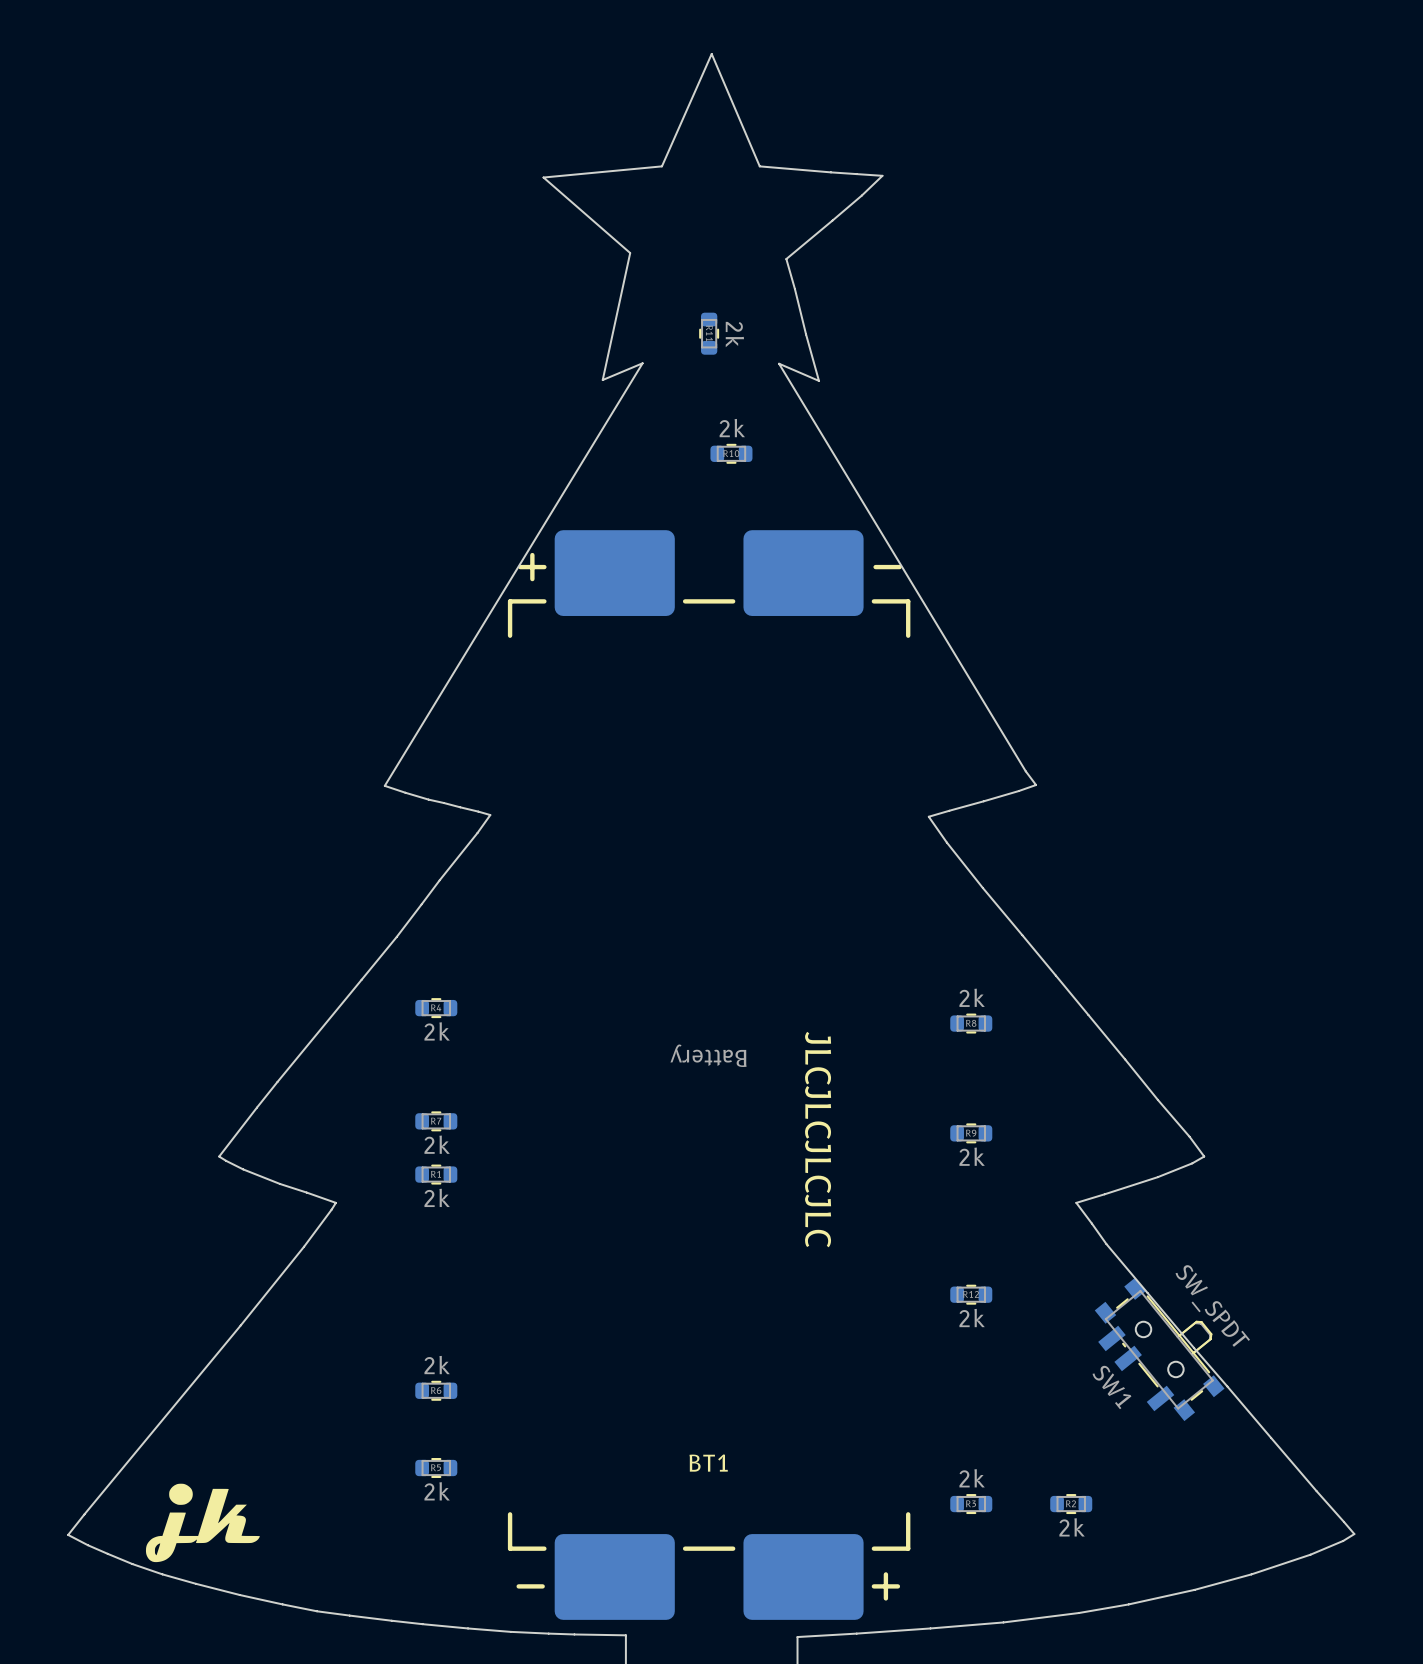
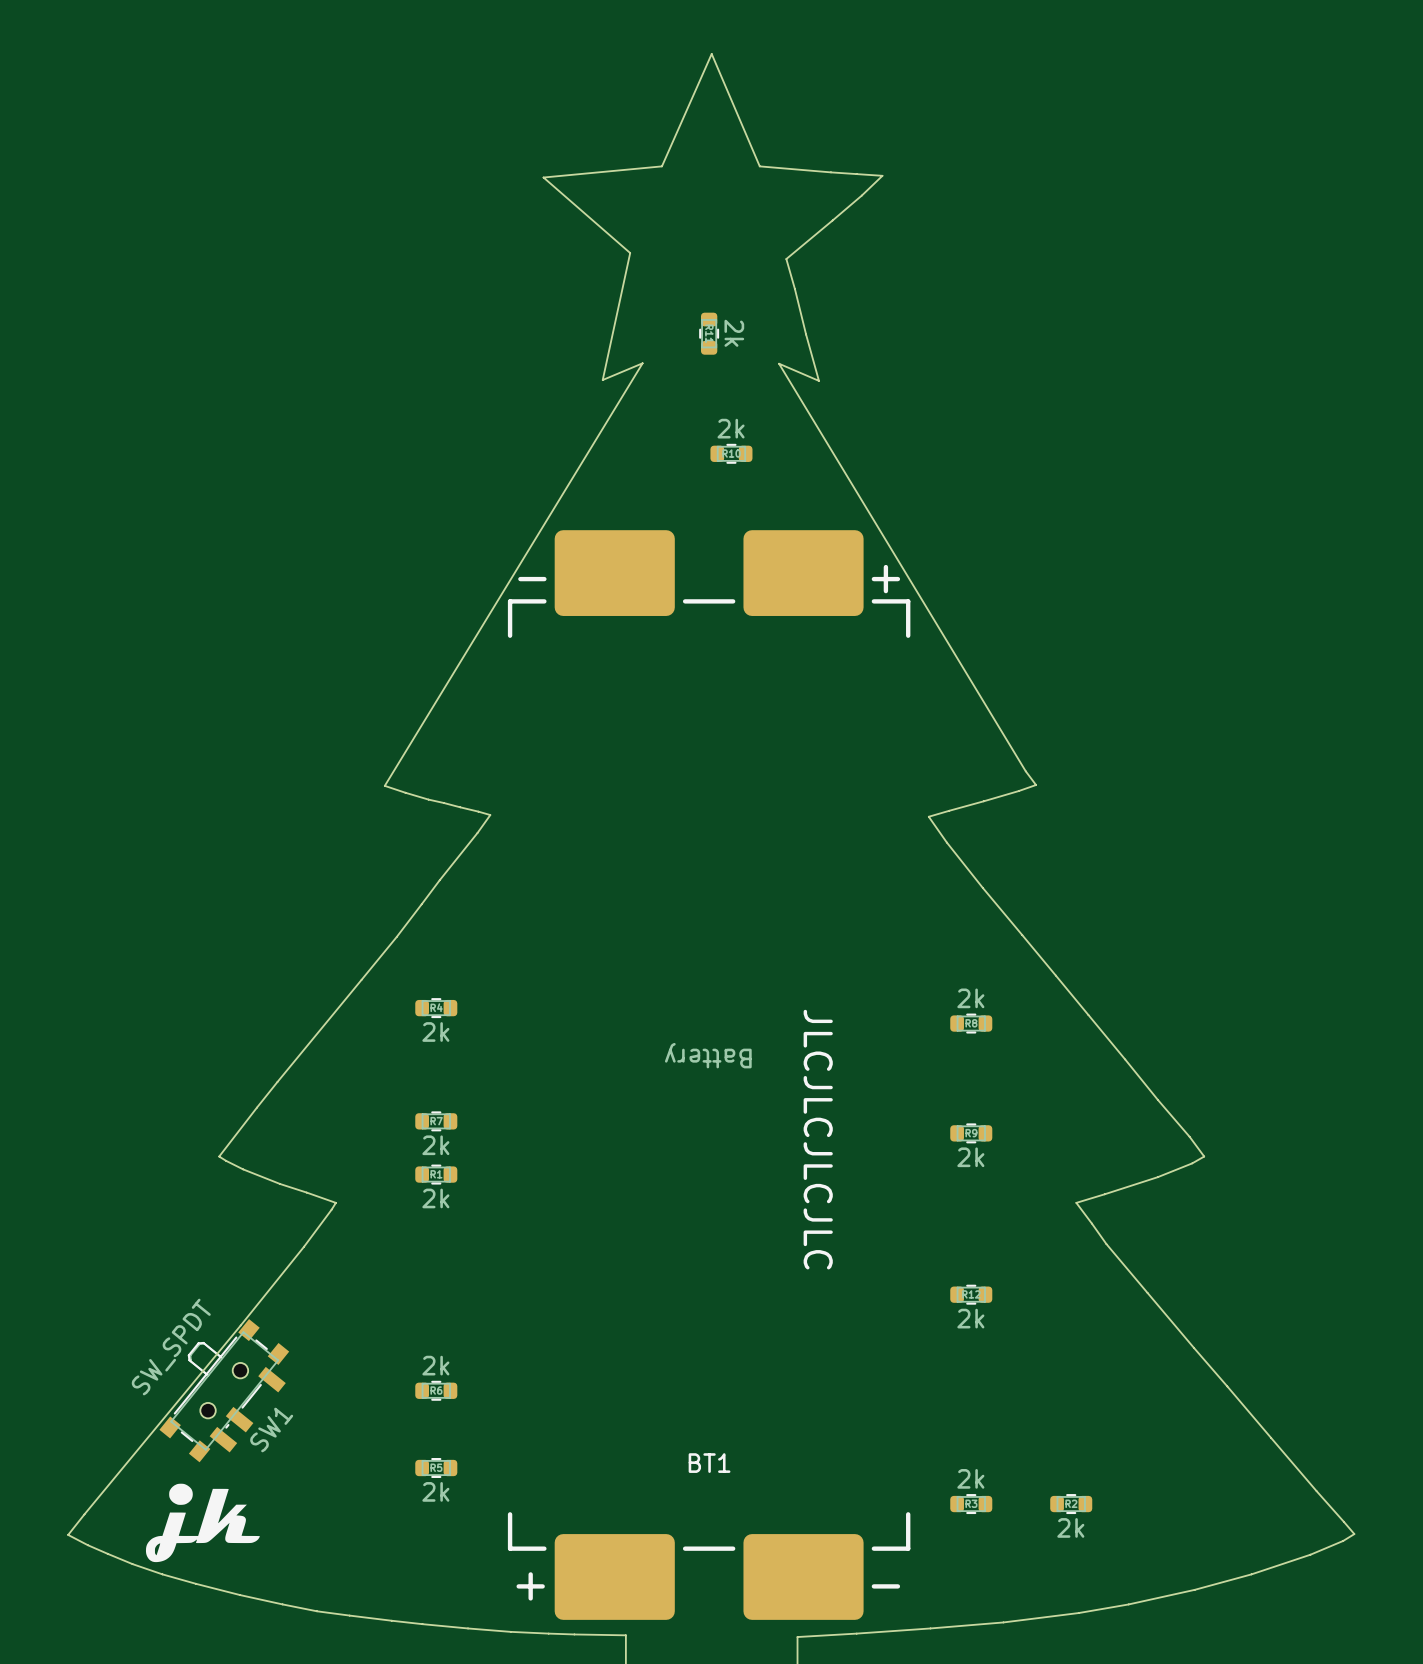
BT1 footprint: [507, 530, 911, 1620] -> [507, 530, 911, 1620]
line: none -> (885, 567) (885, 591)
line: none -> (544, 579) (520, 579)
line: none -> (897, 579) (873, 579)
SW1 rotation: 0° (1159, 1349) -> 102° counterclockwise (224, 1390)
SW1 position: (1159, 1349) -> (224, 1390)

